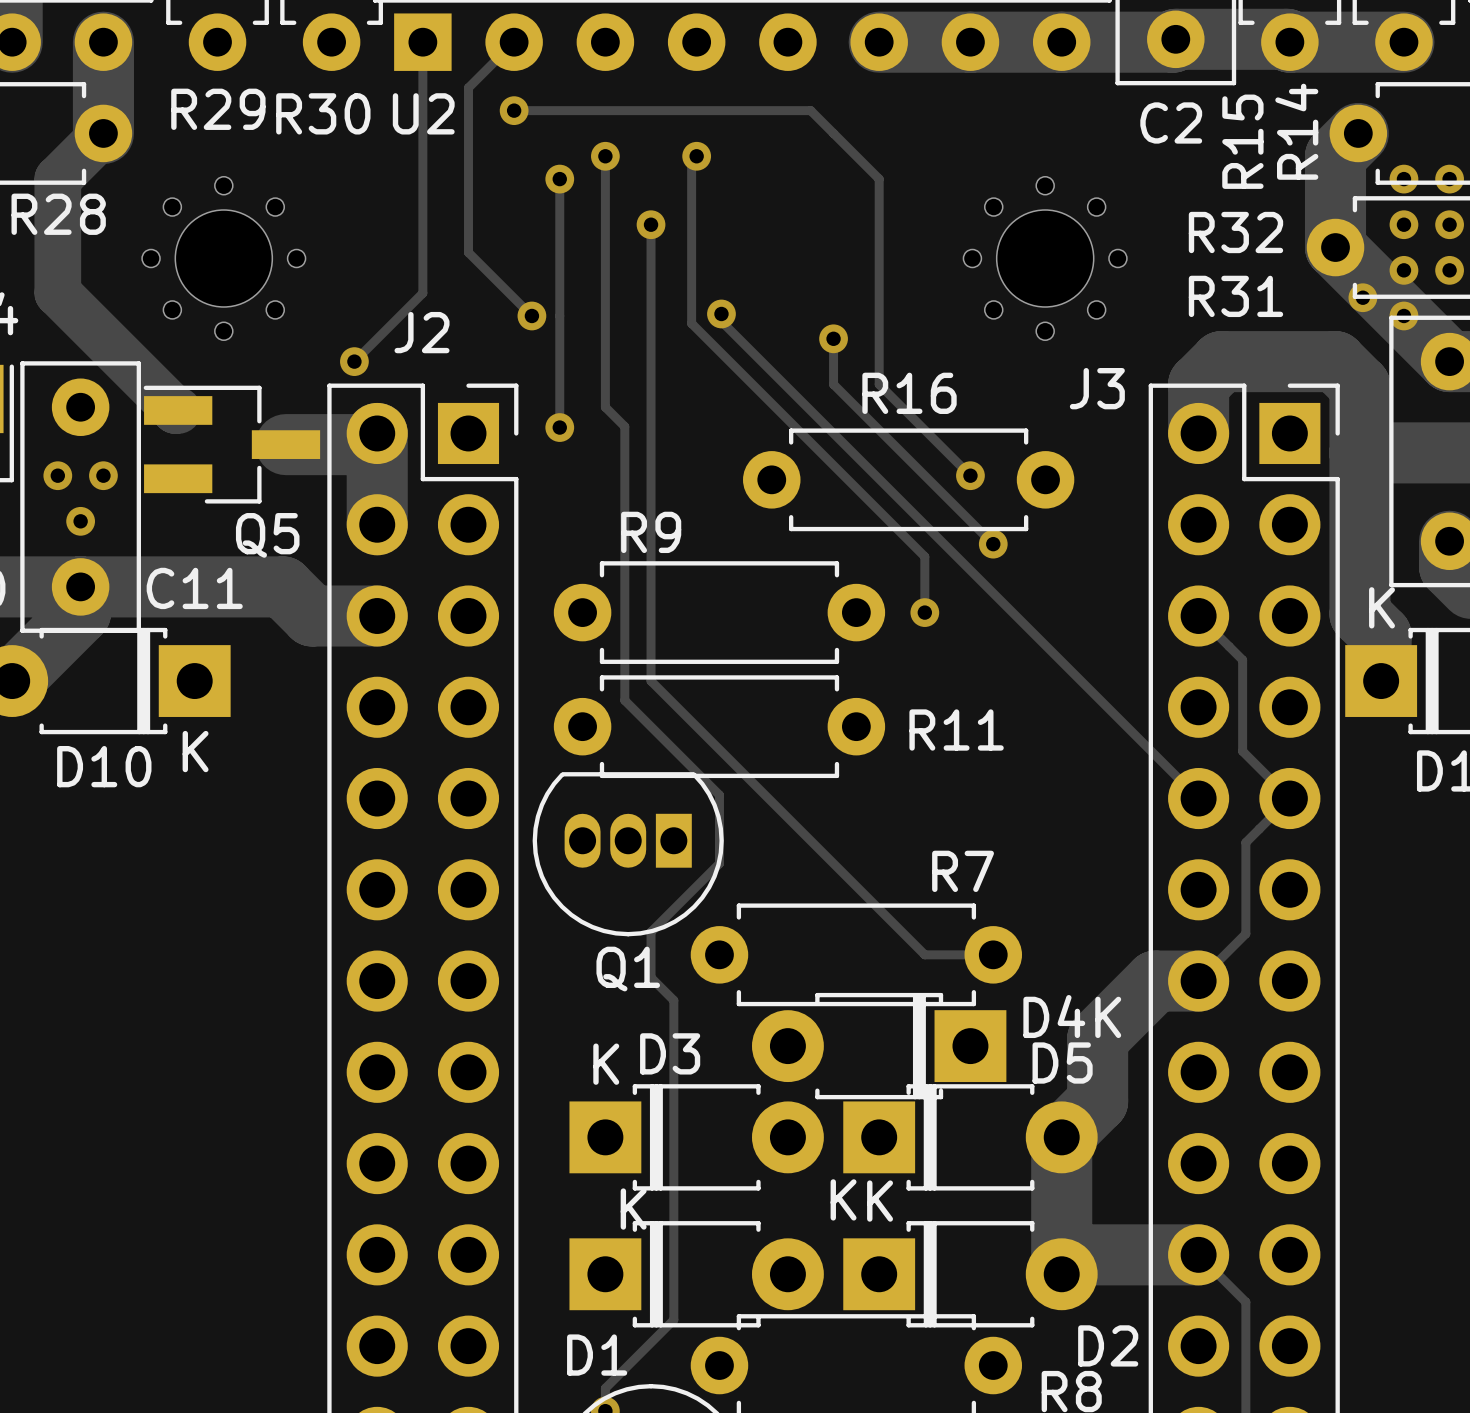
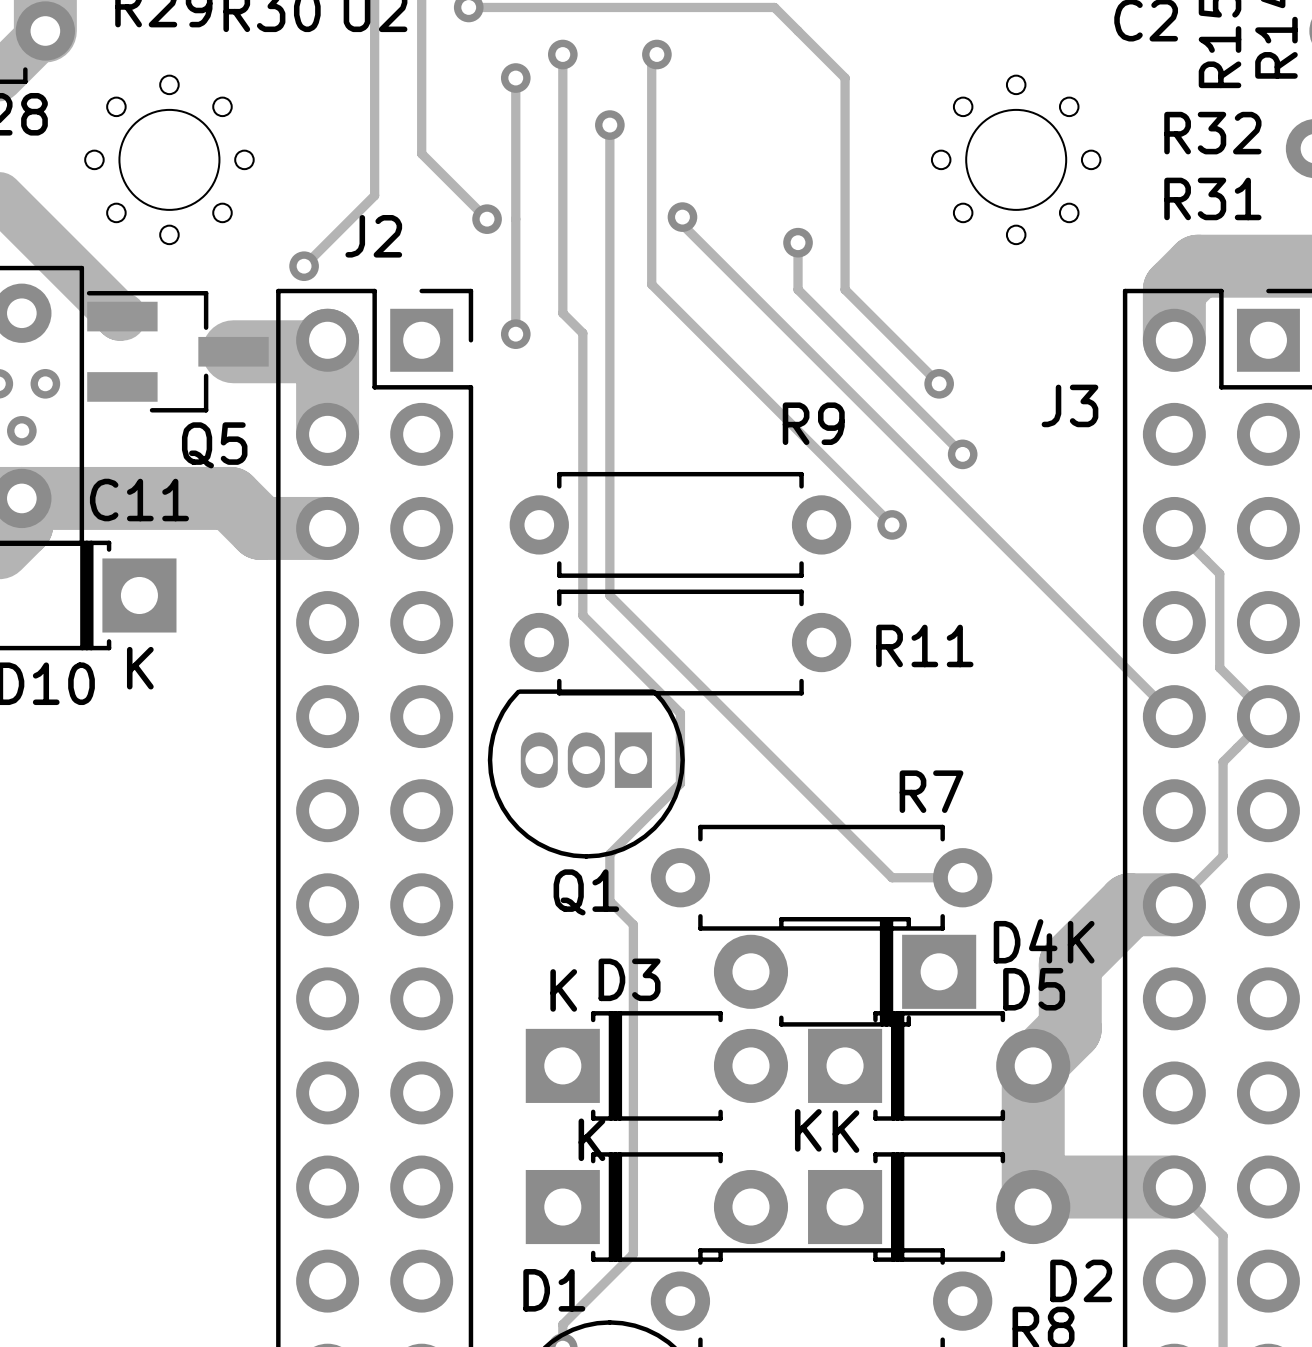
track: (691, 323) (924, 556) (924, 612) -> (651, 226) (651, 284) (892, 524)
J3 name position: J3 (1097, 388) -> J3 (1069, 405)
R16: (908, 479) -> none
R9 name position: R9 (651, 532) -> R9 (813, 423)

